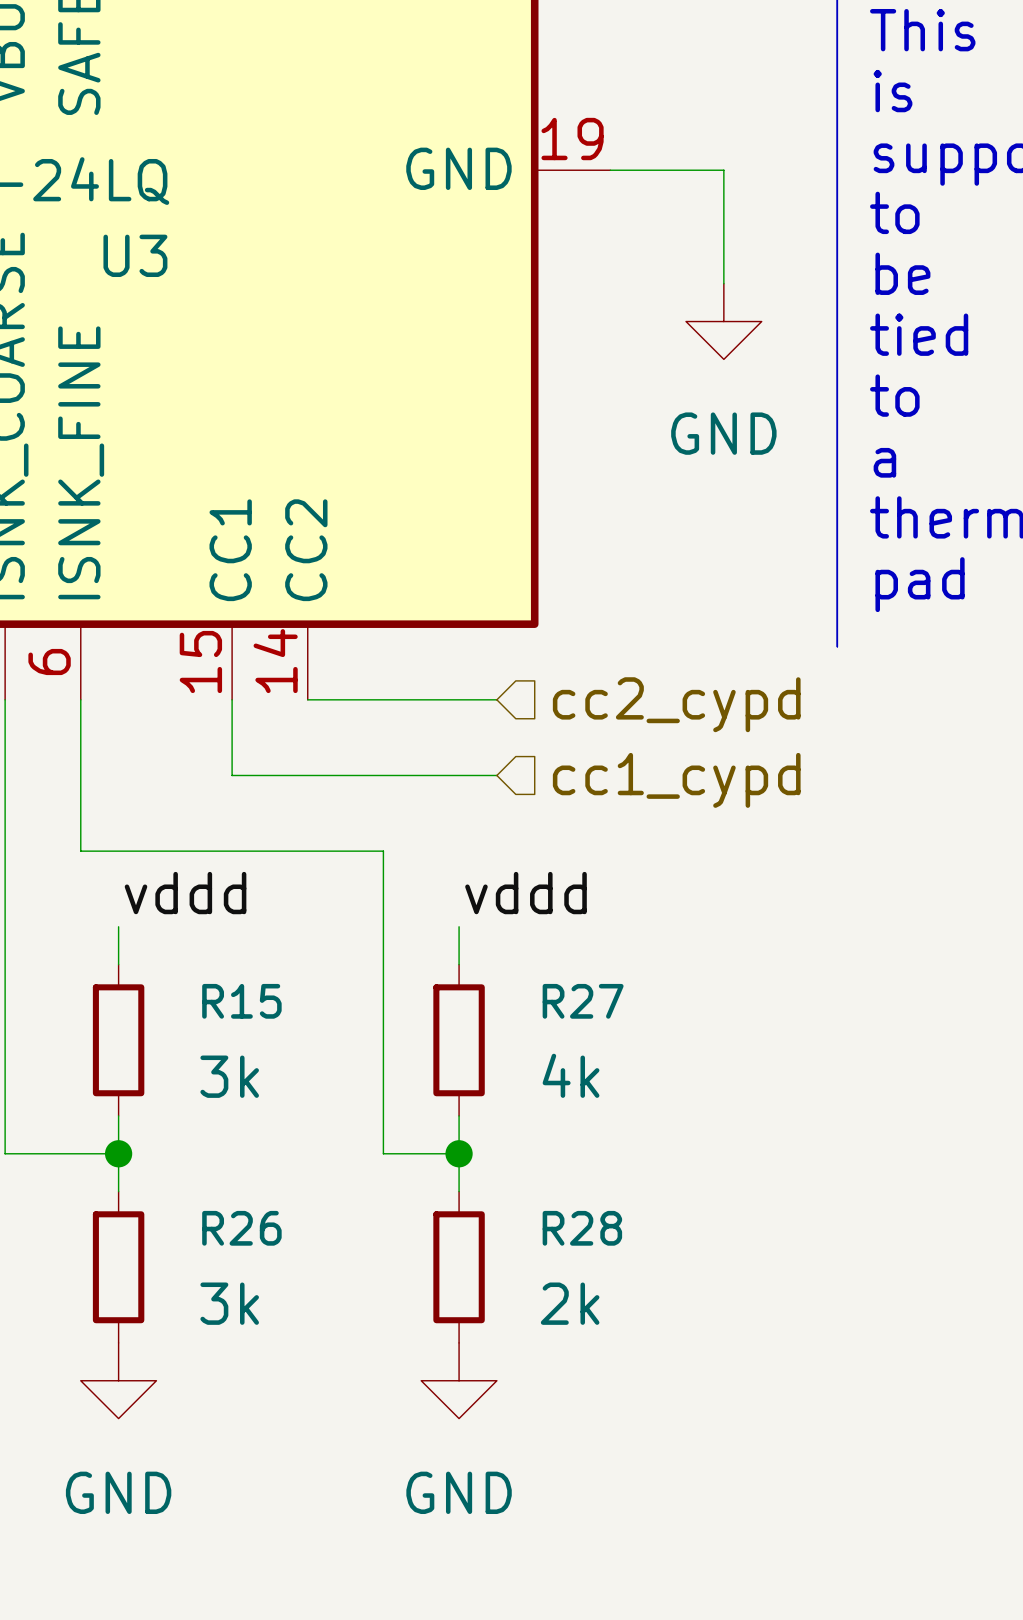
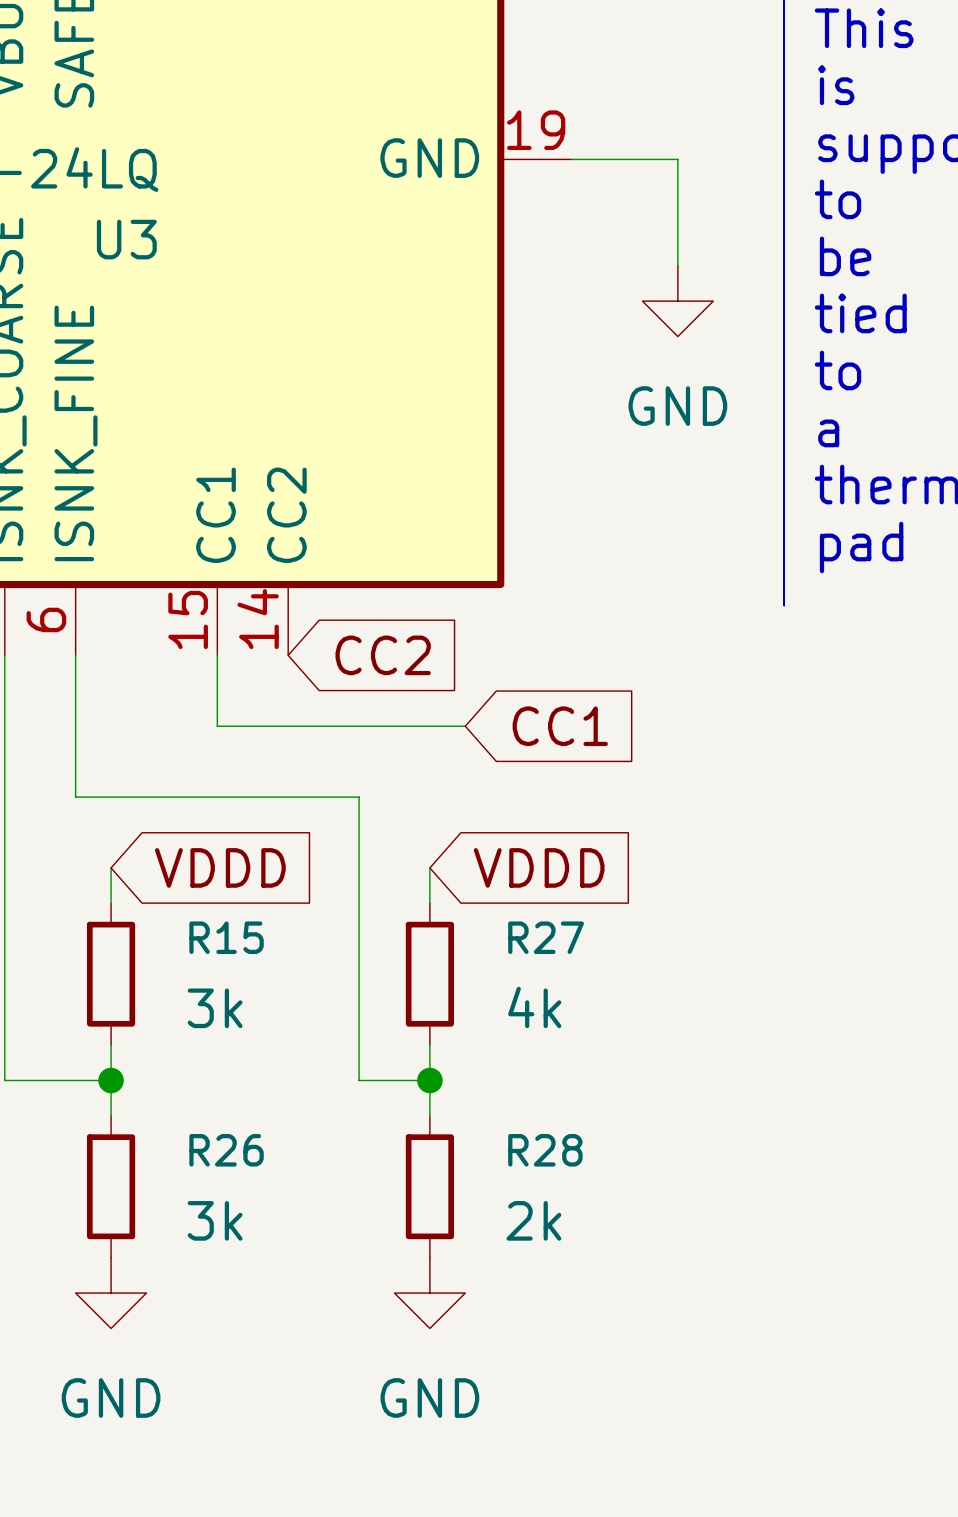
wire: (307, 699) (496, 699) -> none
global label: none -> CC2 (383, 655)
hierarchical label: cc2_cypd (676, 704) -> none
global label: none -> CC1 (560, 726)
hierarchical label: cc1_cypd (676, 780) -> none
label: vddd (185, 893) -> none
label: vddd (525, 893) -> none
global label: none -> VDDD (220, 867)
global label: none -> VDDD (539, 867)

